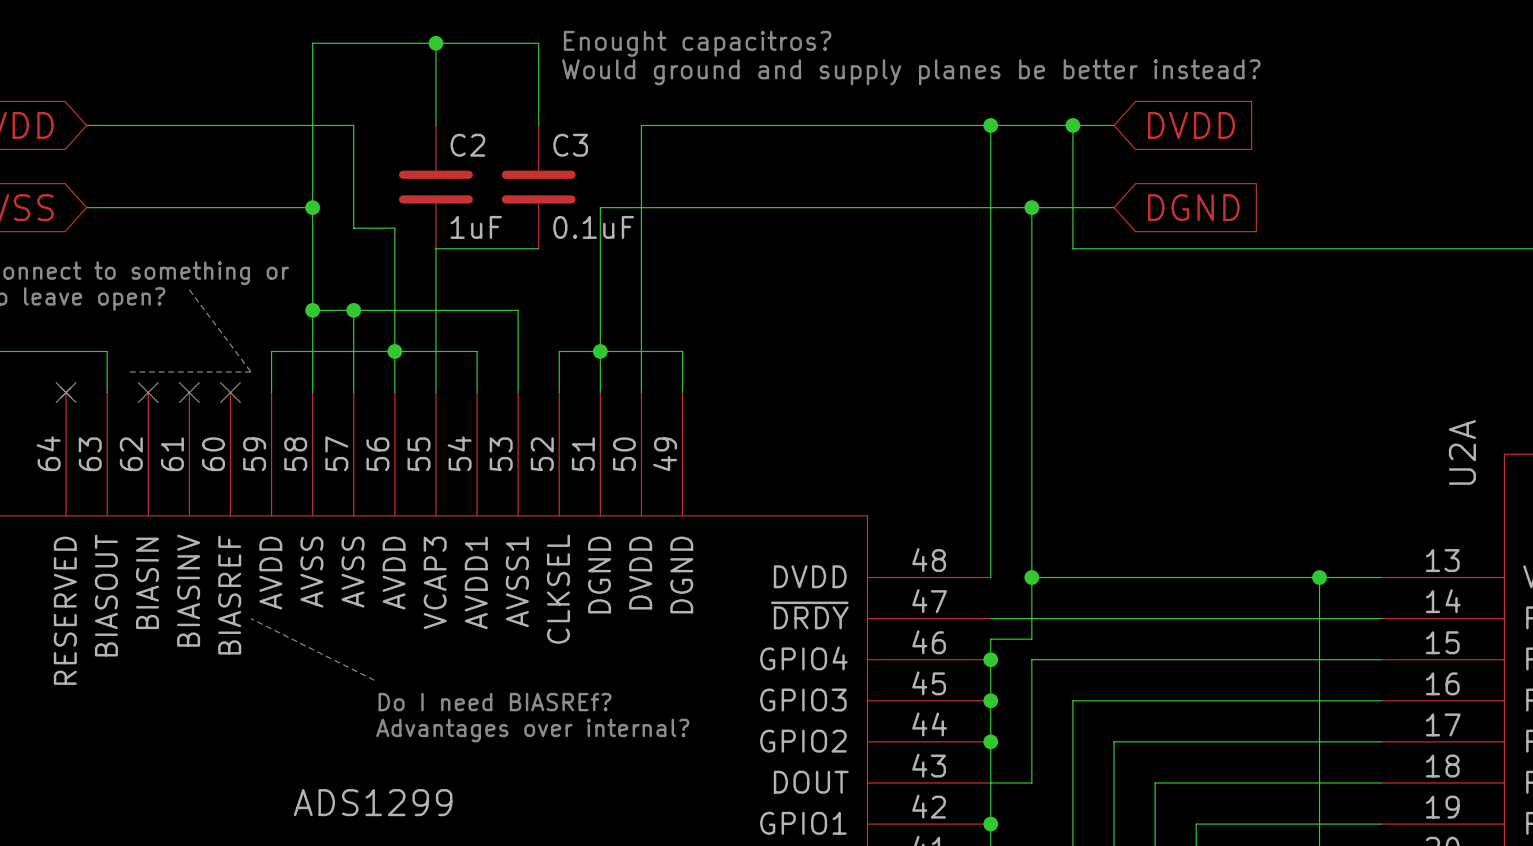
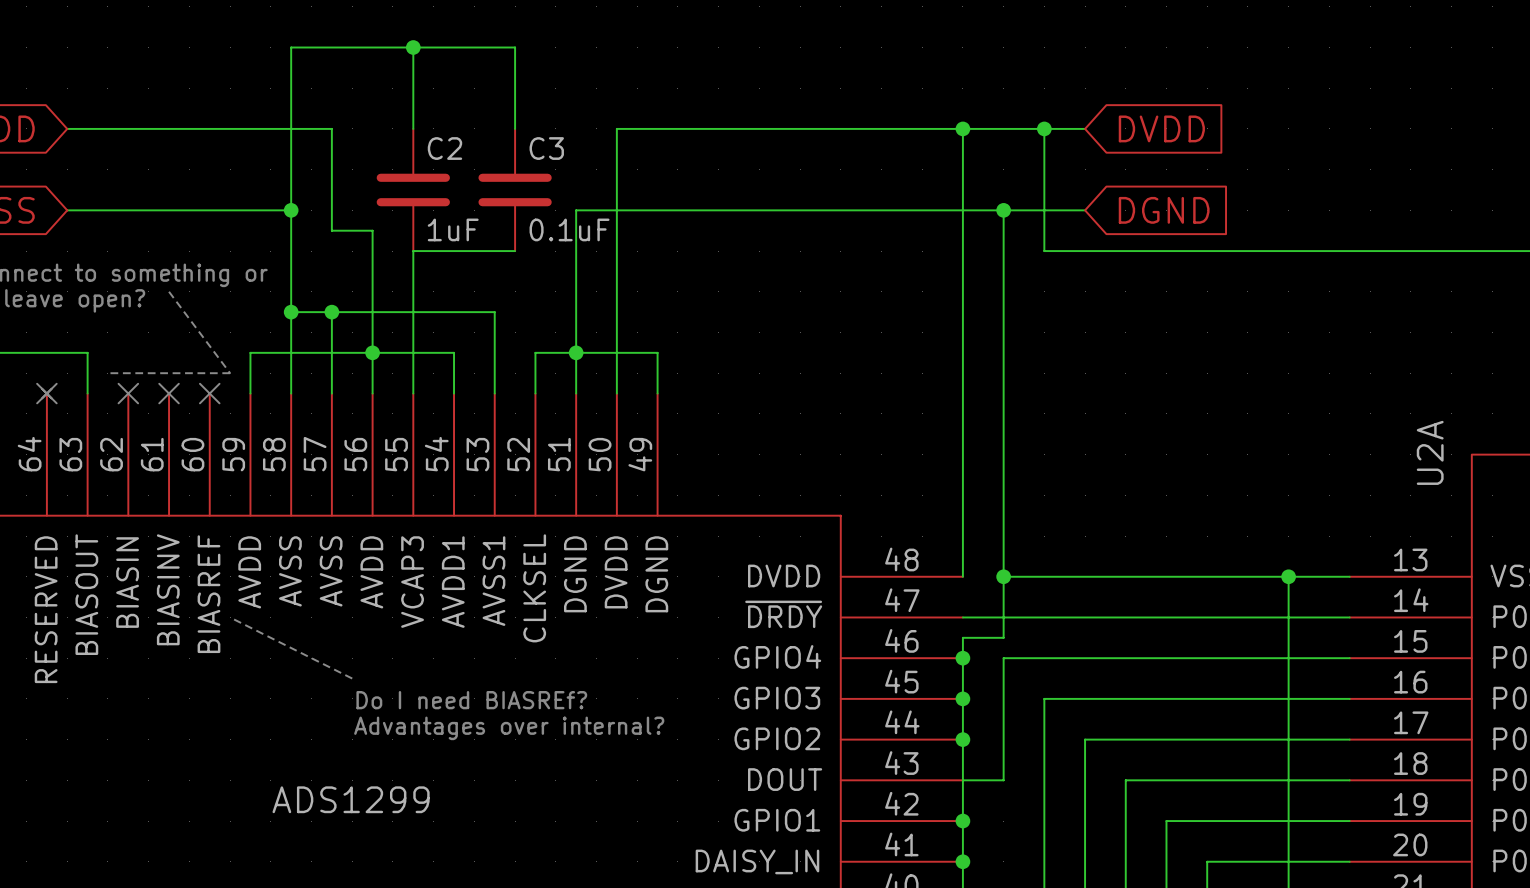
text: Enought capacitros? (697, 43) -> none
text: Would ground and supply planes be better instead? (911, 72) -> none

